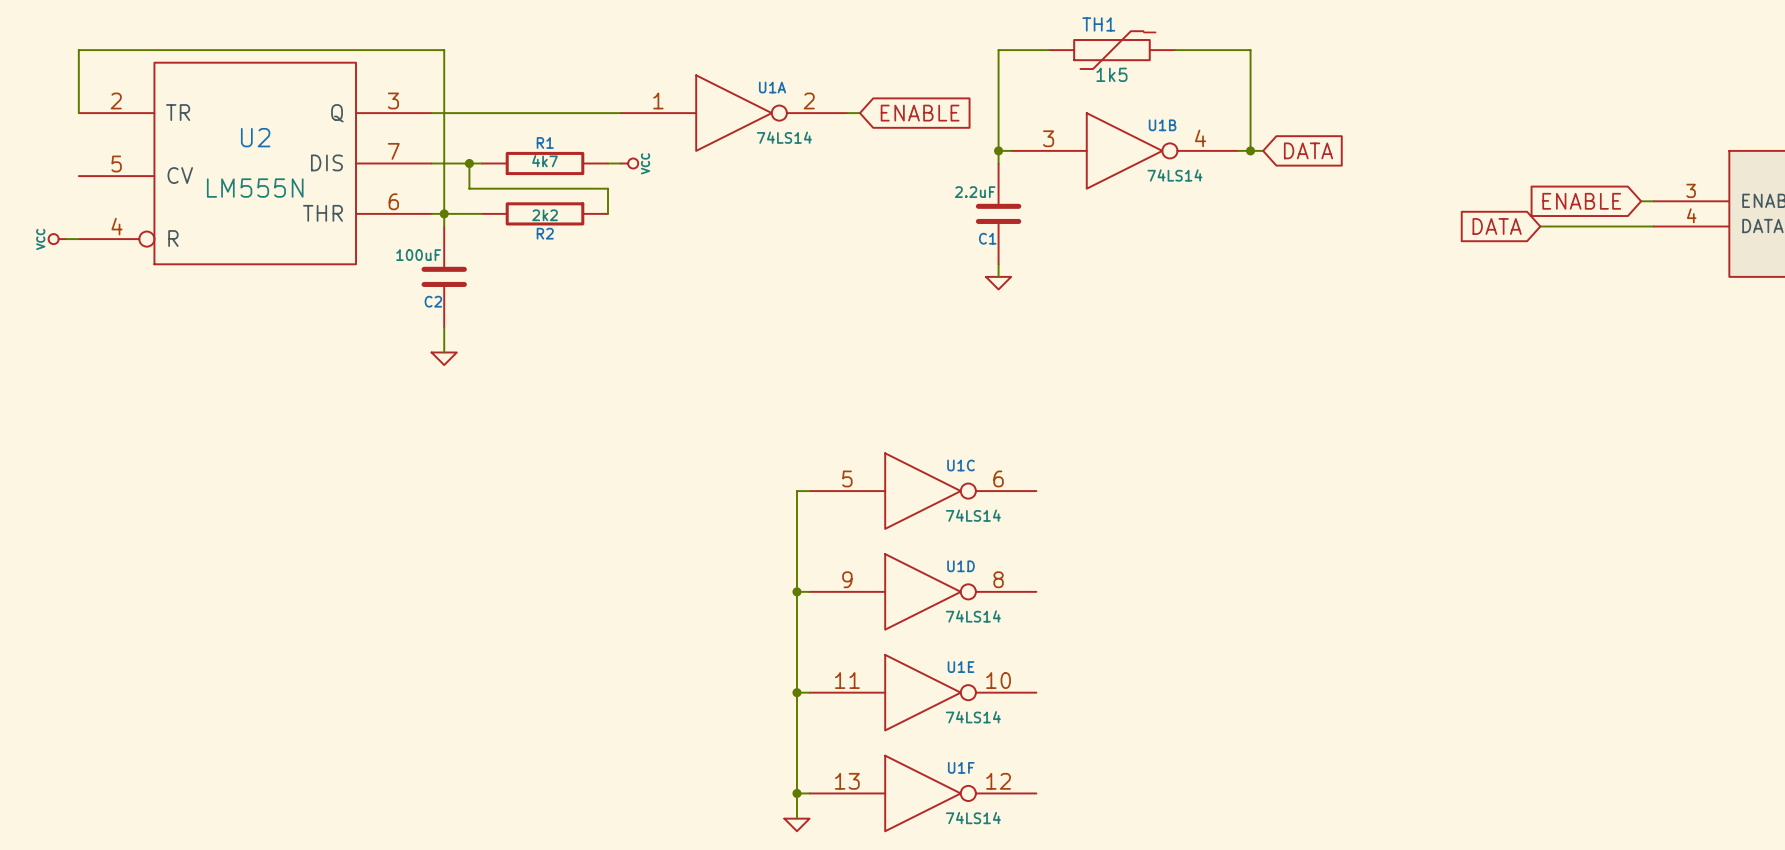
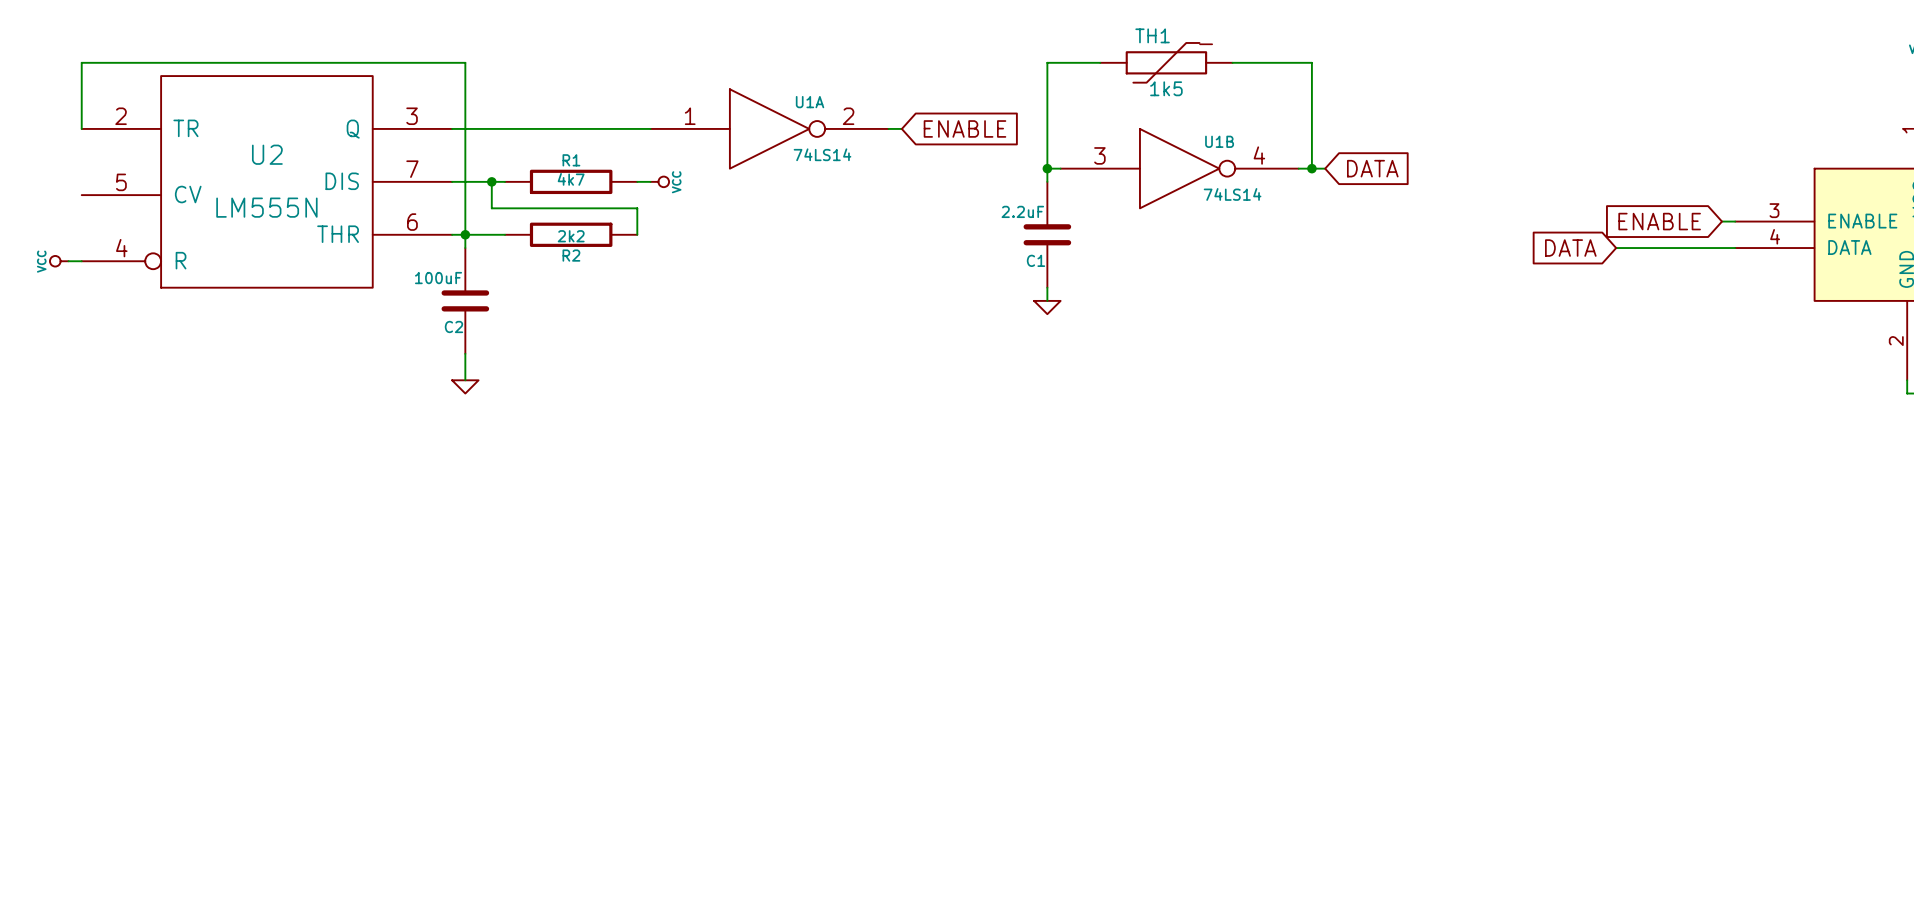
wire: (809, 491) (796, 491) (796, 818) -> none
U1C: 74LS14 (922, 491) -> none
wire: (796, 591) (809, 591) -> none
junction: (796, 591) -> none
U1D: 74LS14 (922, 591) -> none
wire: (796, 692) (809, 692) -> none
junction: (796, 692) -> none
U1E: 74LS14 (922, 692) -> none
wire: (796, 793) (809, 793) -> none
junction: (796, 793) -> none
U1F: 74LS14 (922, 793) -> none
power symbol: (796, 824) -> none

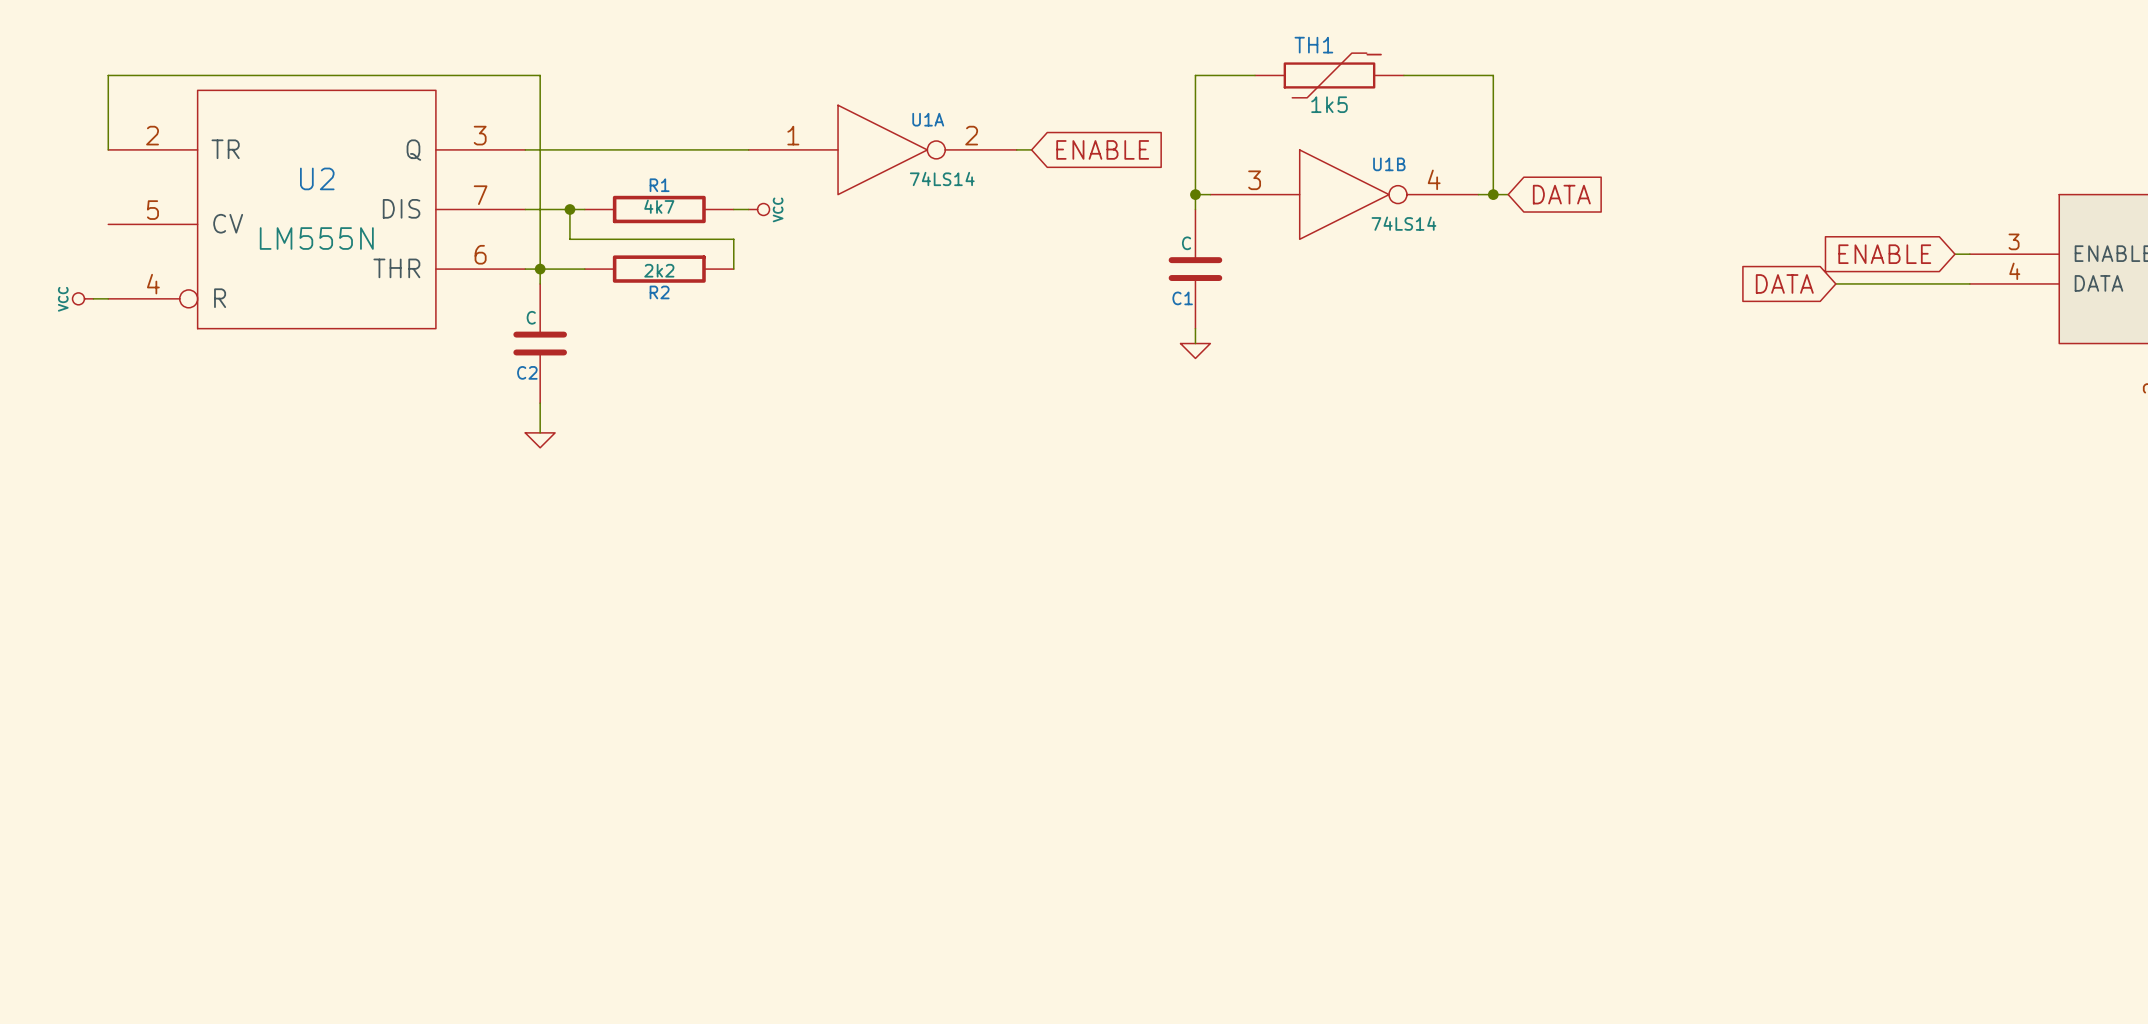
C1 value: 2.2uF (1022, 211) -> C (1186, 243)
C2 value: 100uF (438, 278) -> C (531, 317)

